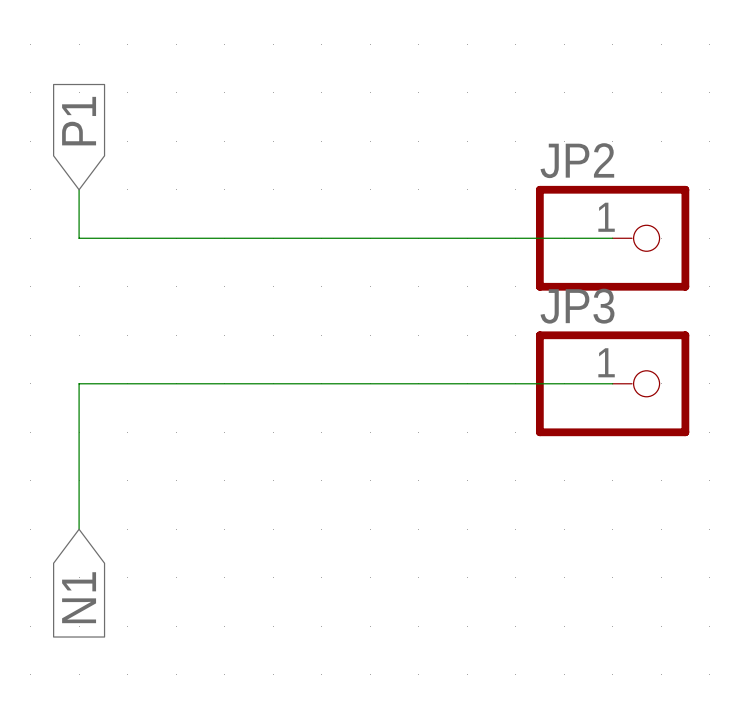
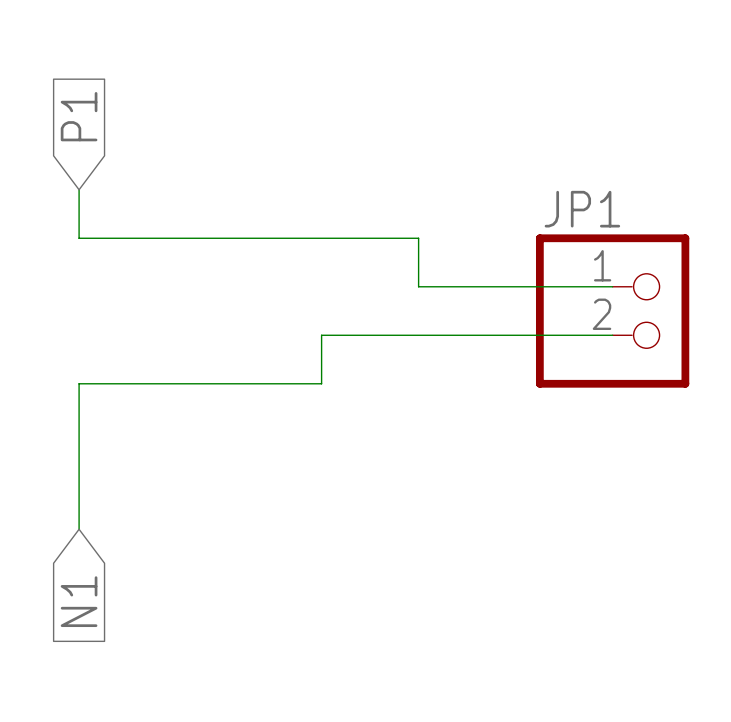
wire: (418, 238) (612, 238) -> (418, 238) (418, 286) (612, 286)
JP2: (612, 238) -> none
JP1: none -> (612, 311)
wire: (321, 383) (612, 383) -> (321, 383) (321, 335) (612, 335)
JP3: (612, 383) -> none

